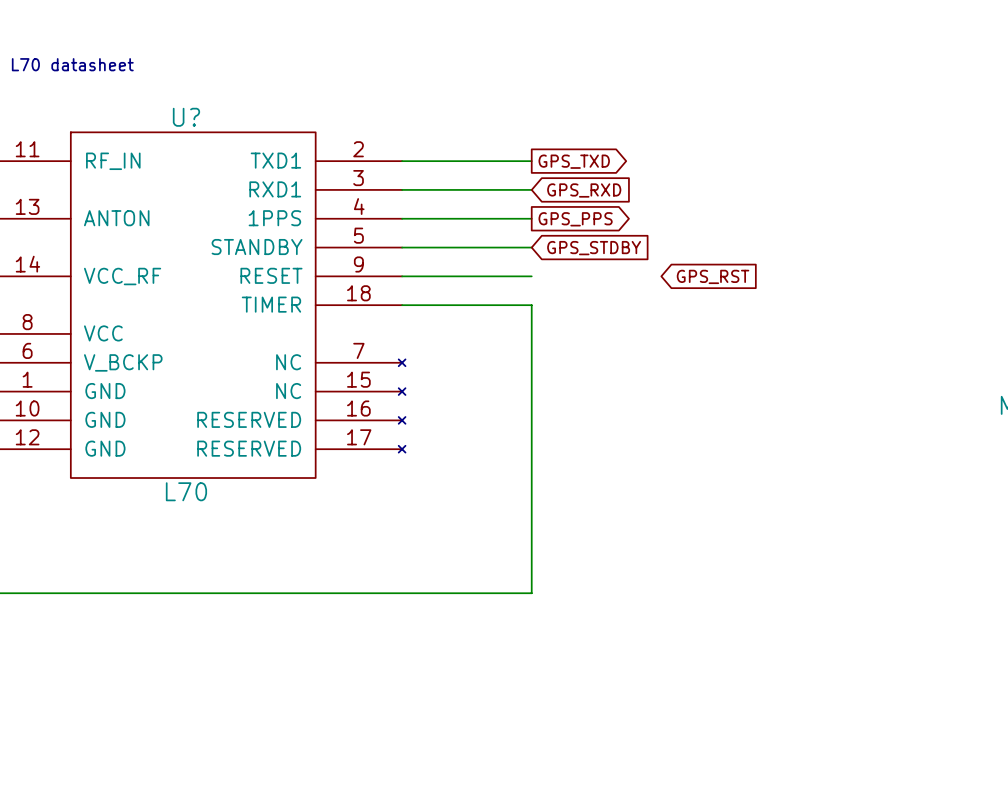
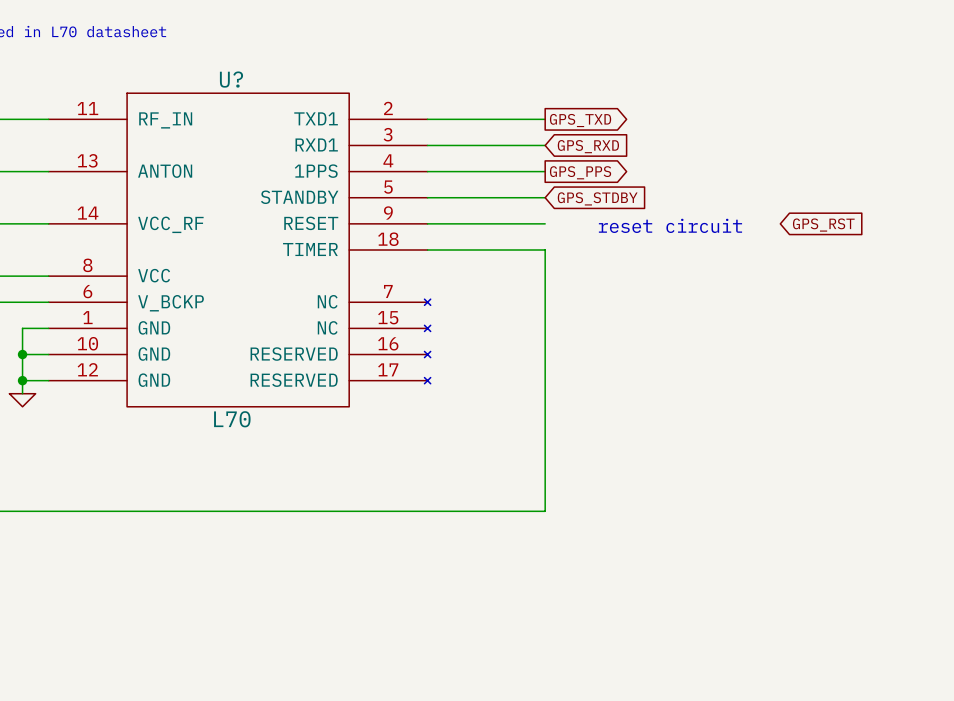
global label position: GPS_RST (713, 276) -> GPS_RST (823, 225)
text: none -> reset circuit (670, 225)

